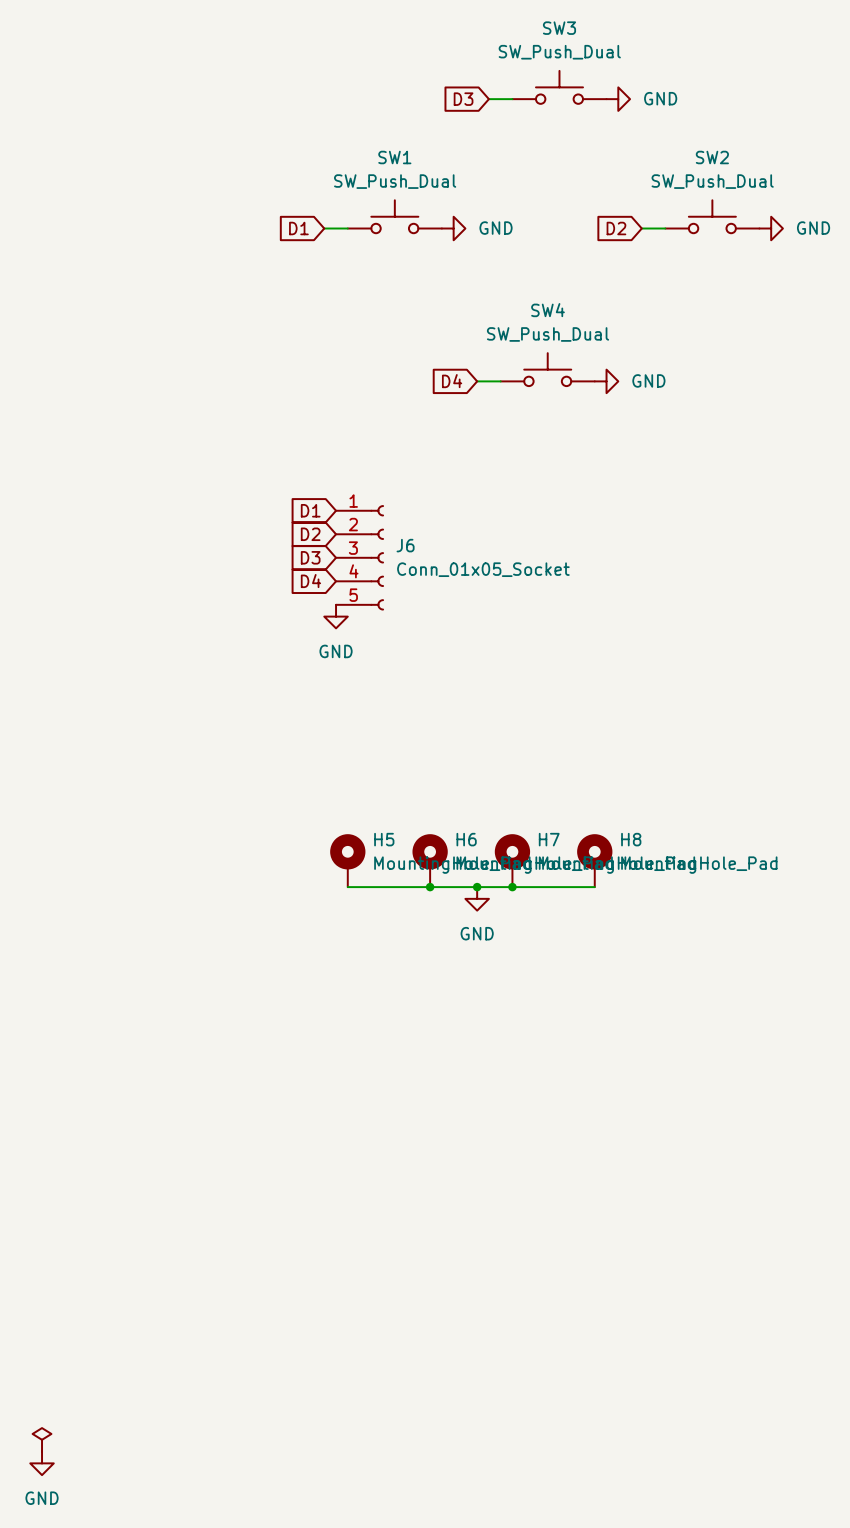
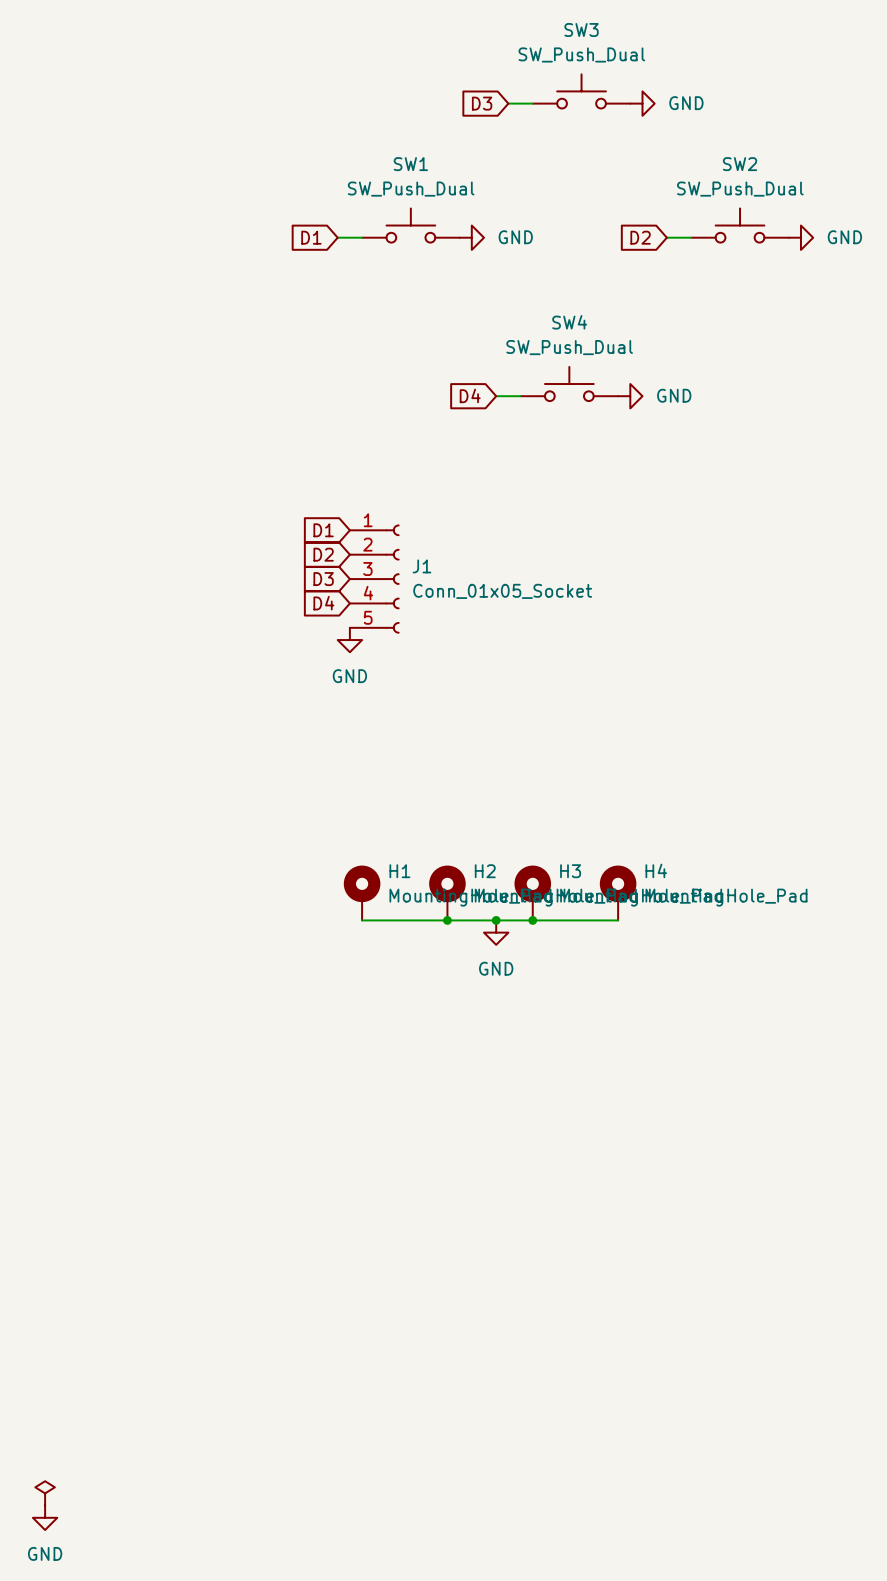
J6 name: J6 (405, 545) -> J1 (421, 566)
H5 name: H5 (384, 839) -> H1 (399, 871)
H6 name: H6 (466, 839) -> H2 (485, 871)
H7 name: H7 (549, 839) -> H3 (570, 871)
H8 name: H8 (631, 839) -> H4 (656, 870)

